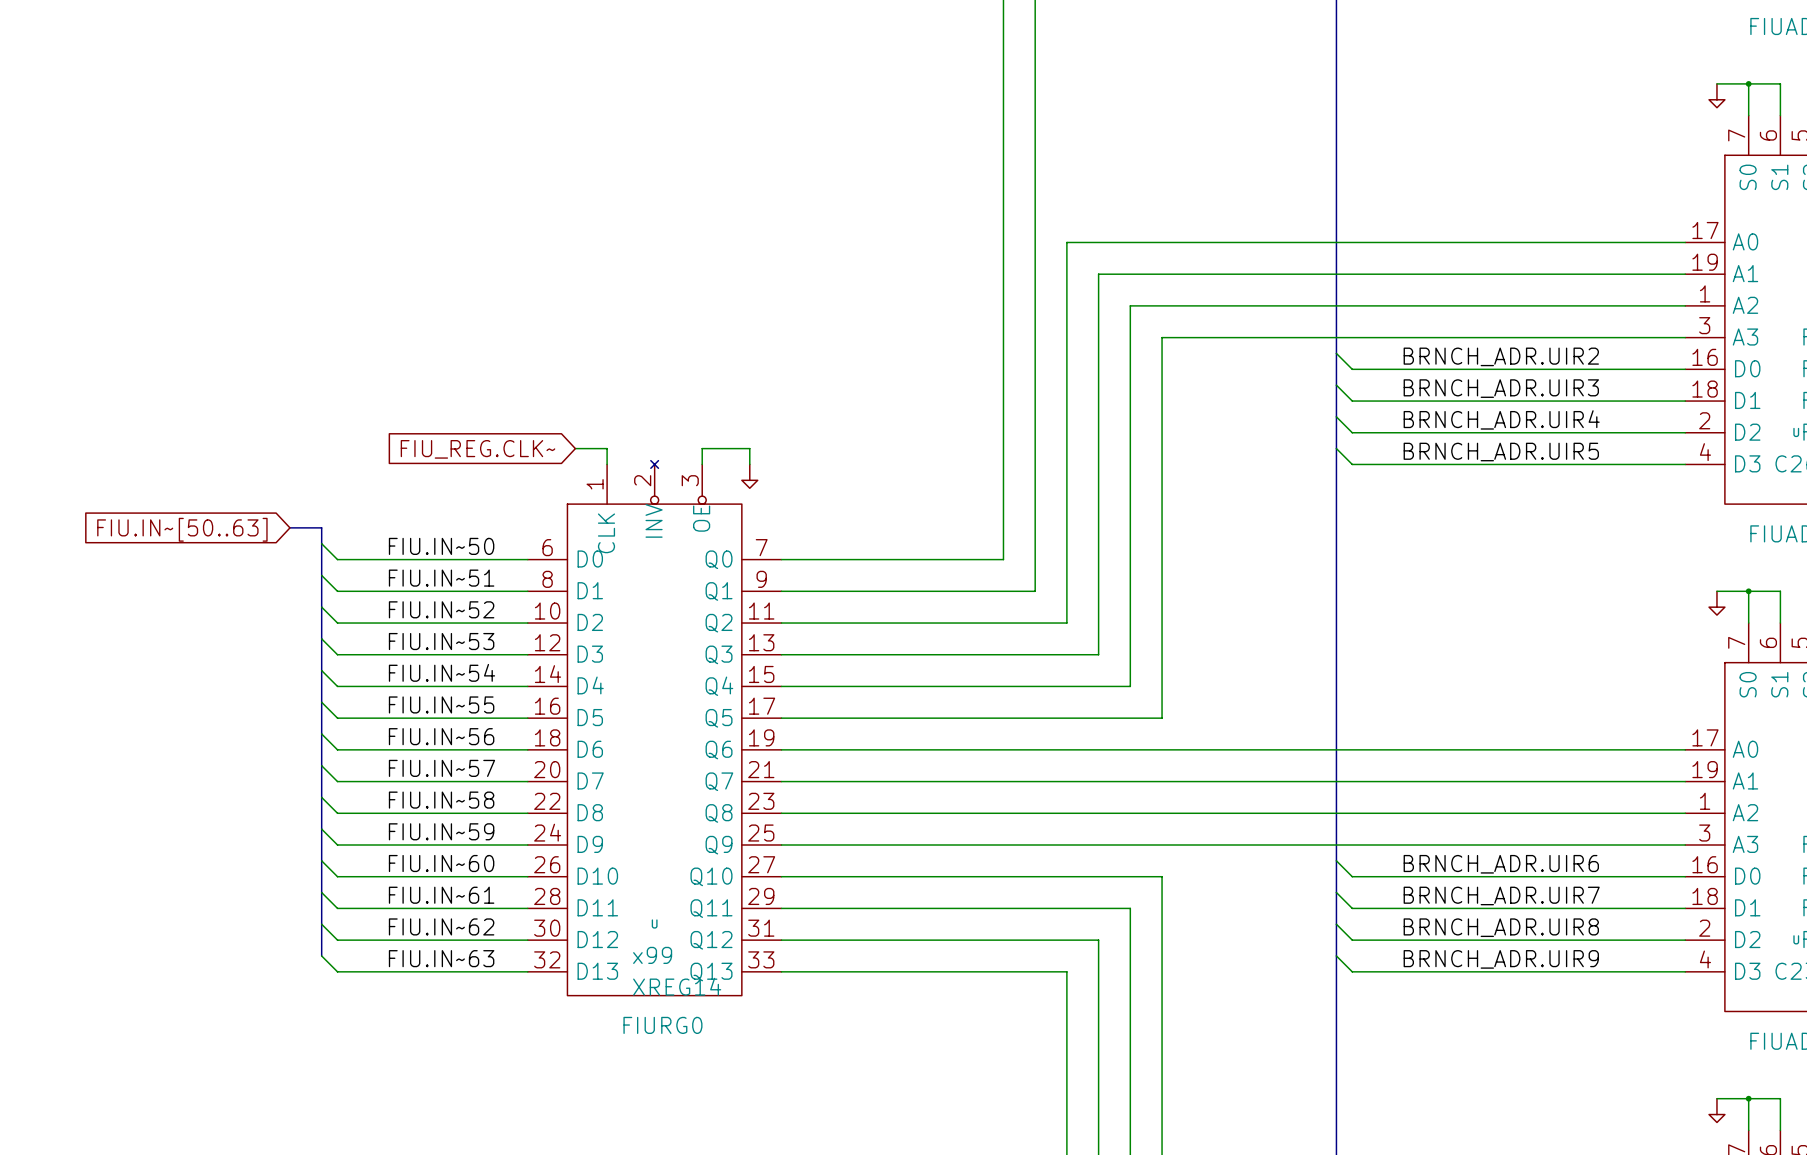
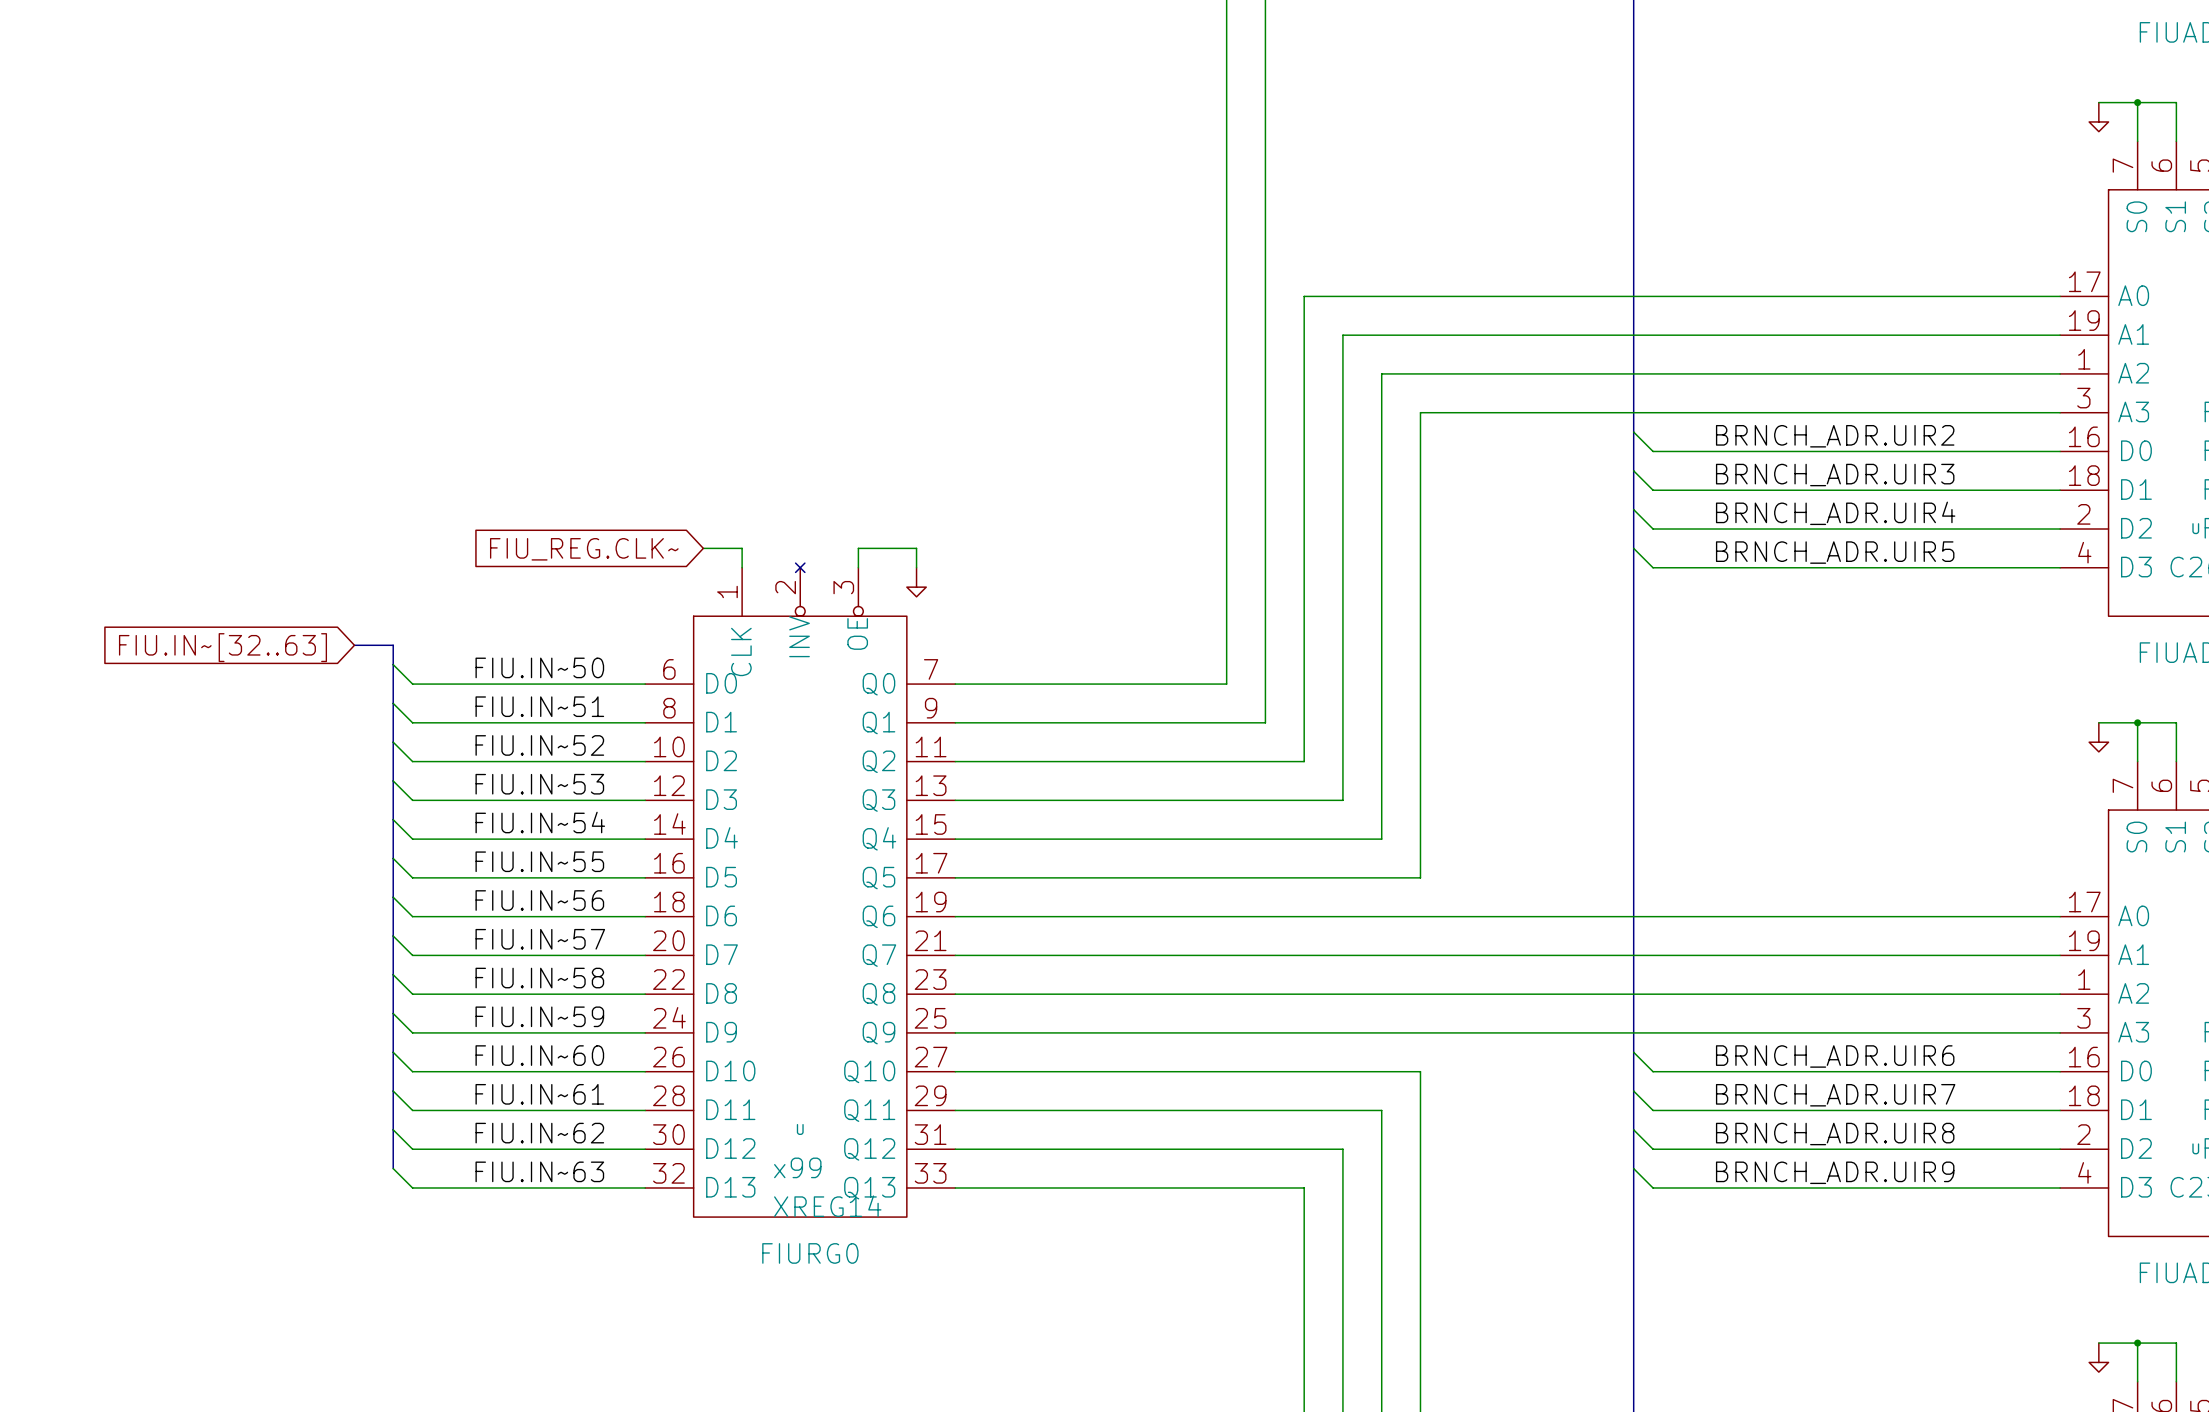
global label: FIU.IN~[50..63] (182, 529) -> FIU.IN~[32..63] (222, 647)

